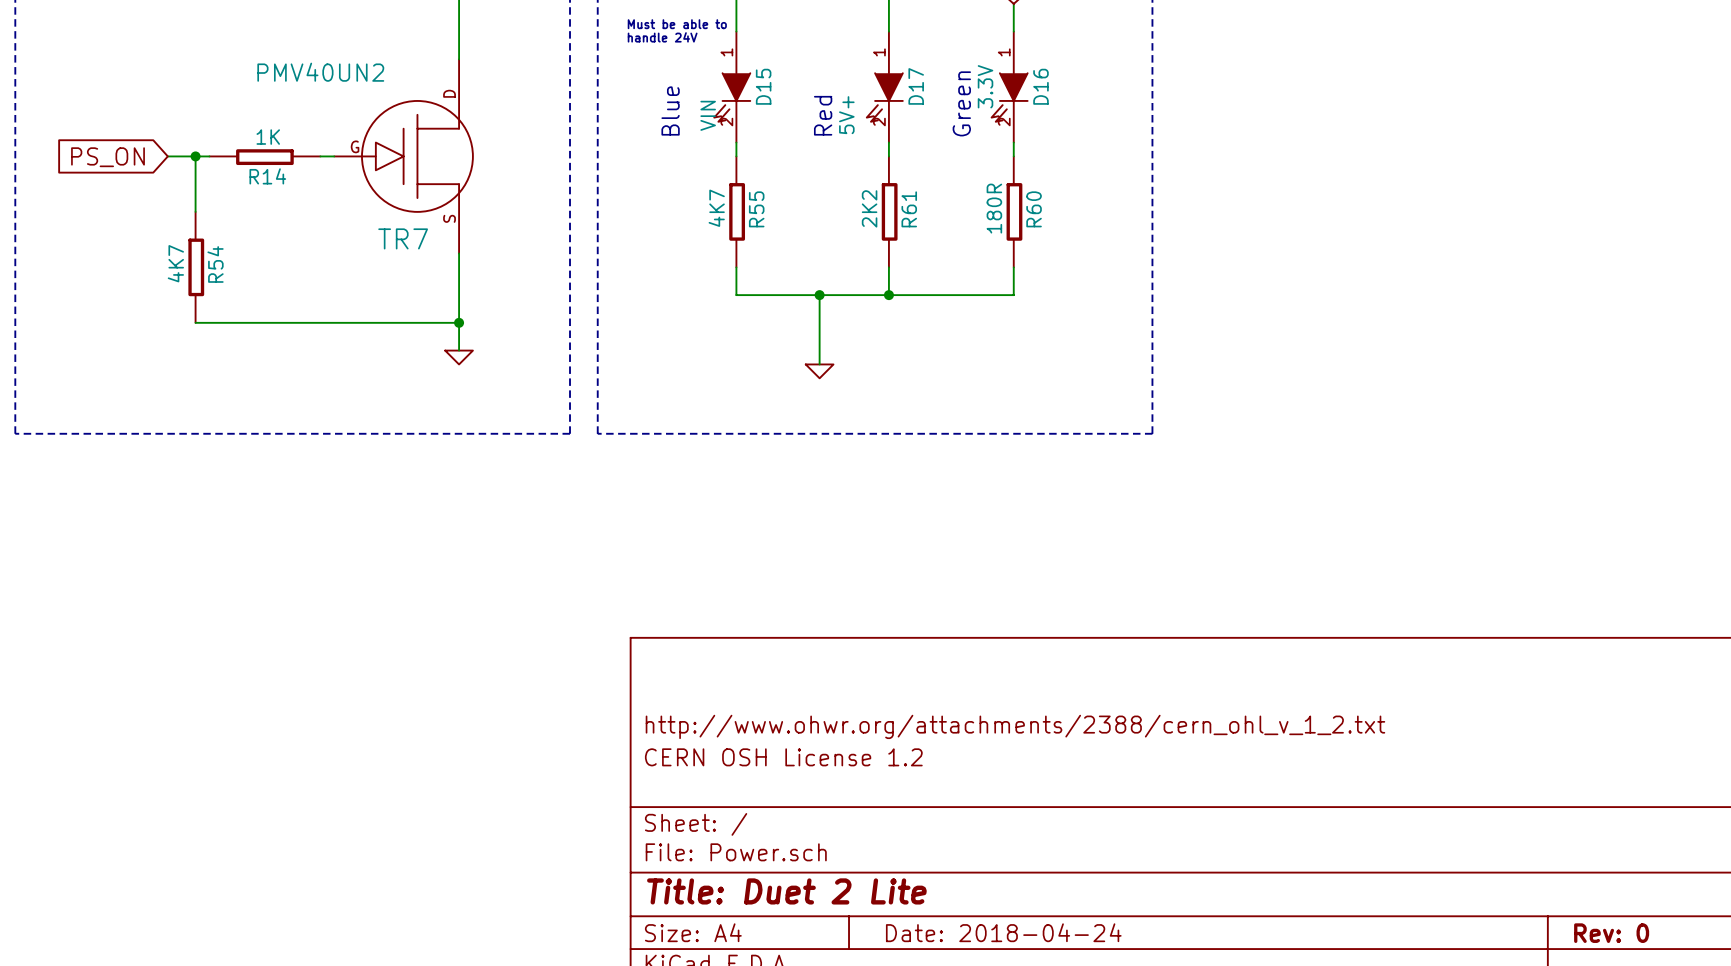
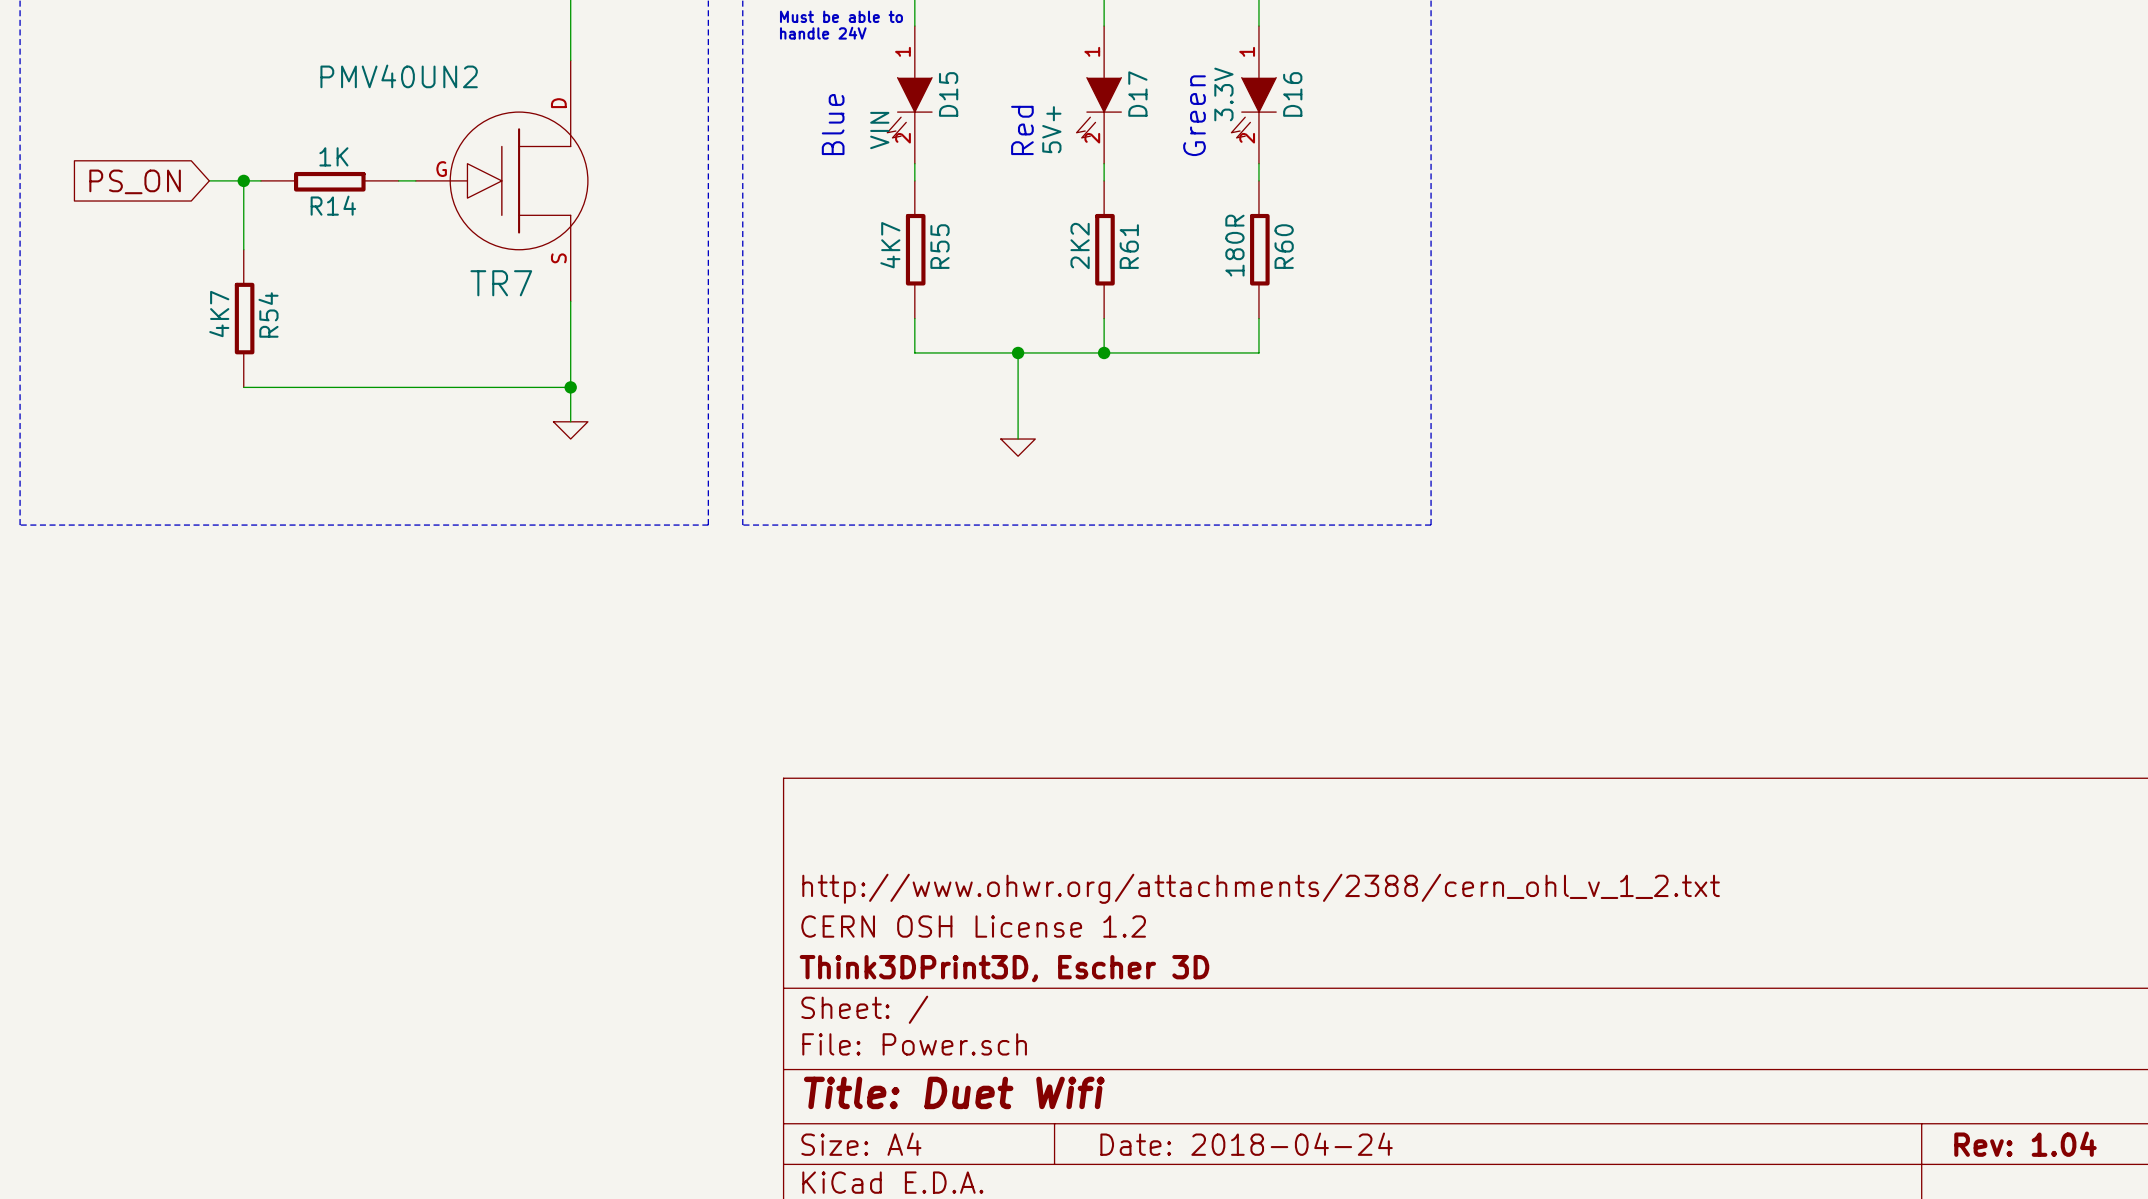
title block: none -> Think3DPrint3D, Escher 3D (1004, 968)
title block: Title: Duet 2 Lite (786, 891) -> Title: Duet Wifi (954, 1092)
title block: Rev: 0 (1611, 933) -> Rev: 1.04 (2025, 1144)

